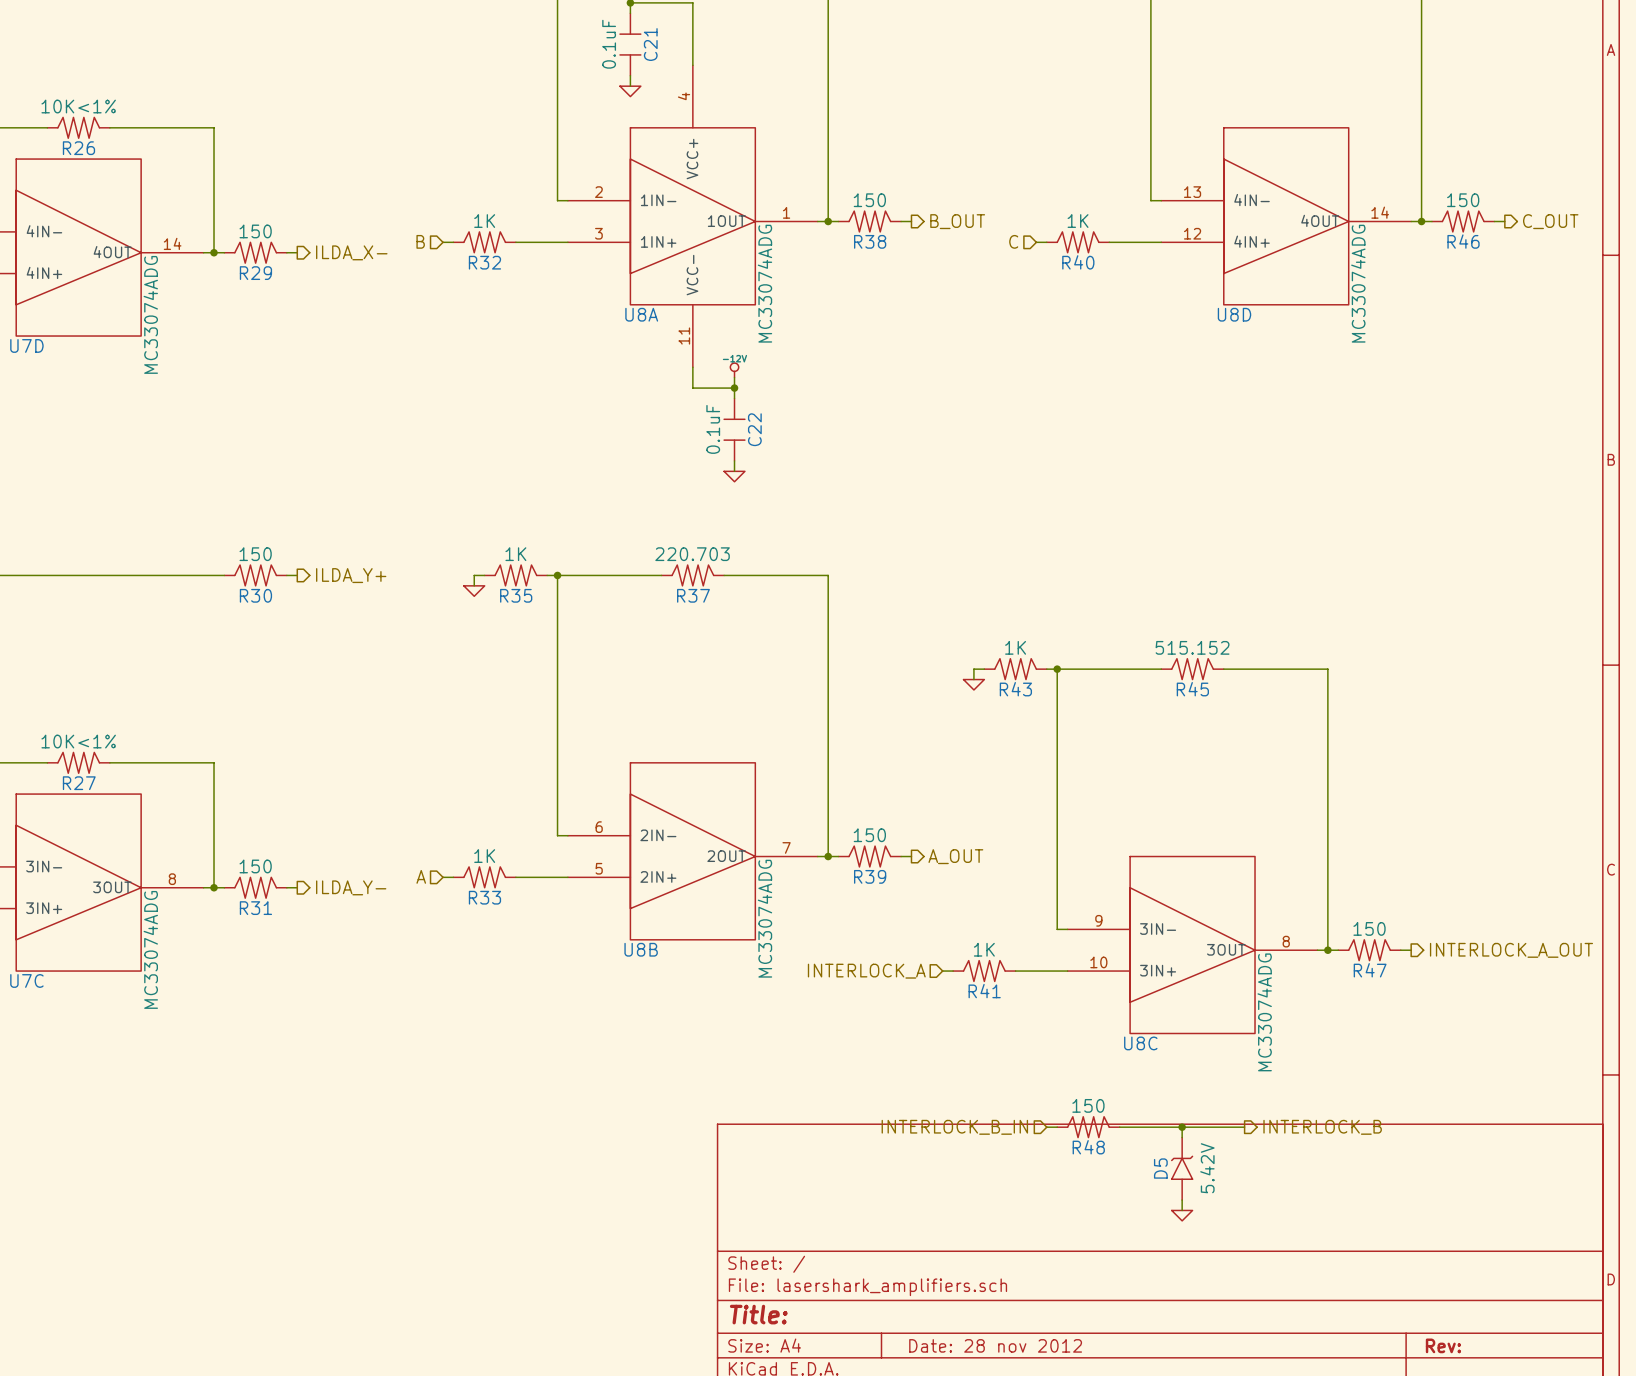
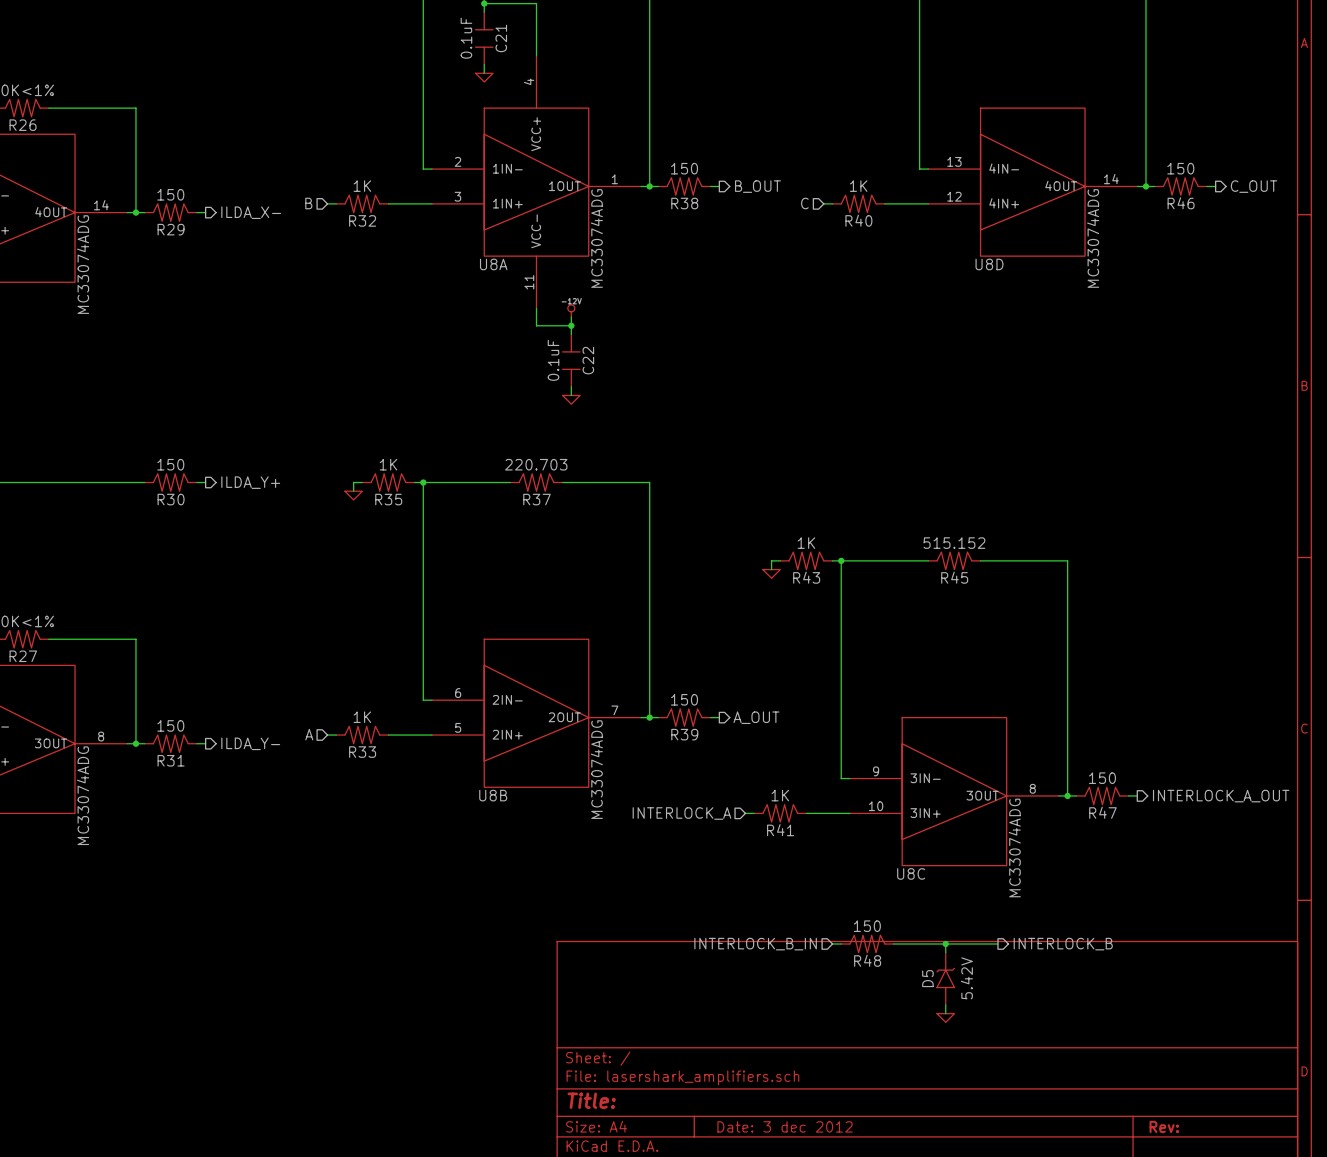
title block: Date: 28 nov 2012 (995, 1345) -> Date: 3 dec 2012 (785, 1126)

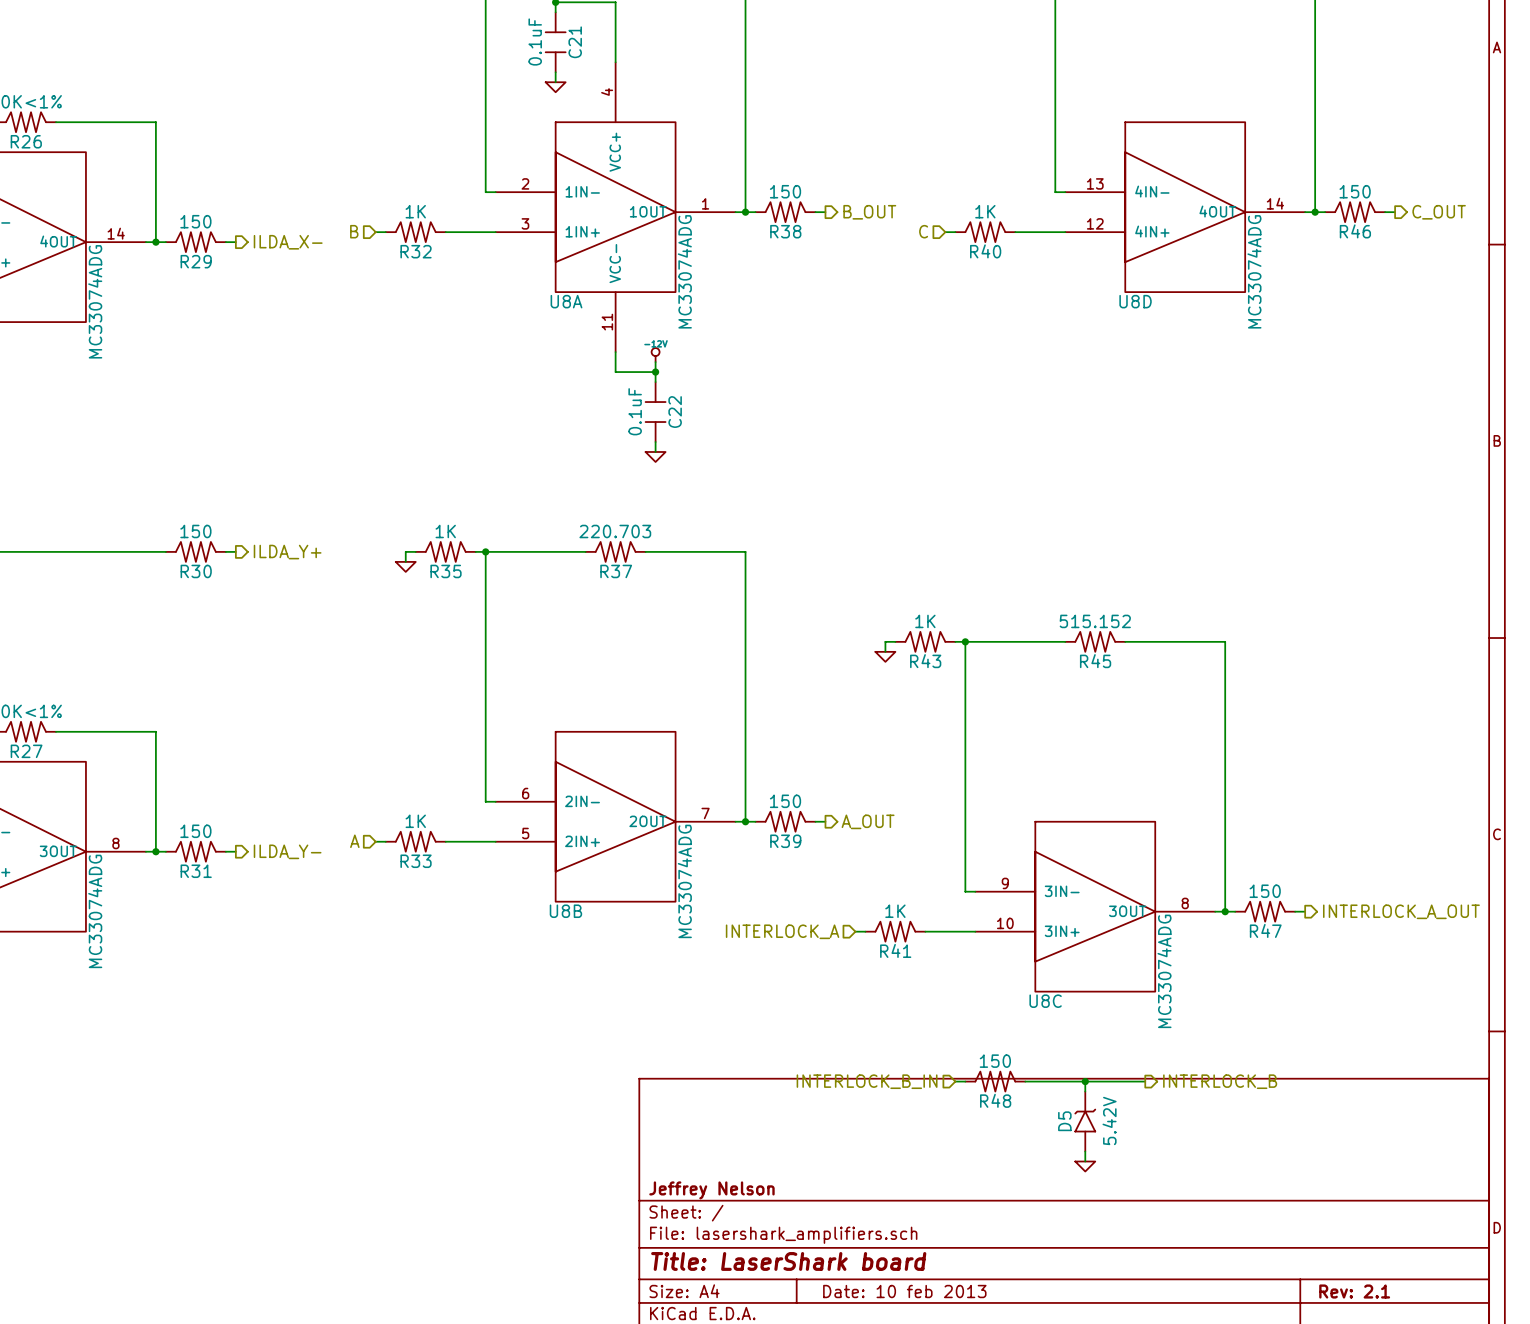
title block: none -> Jeffrey Nelson (711, 1190)
title block: Title: (591, 1100) -> Title: LaserShark board (788, 1261)
title block: Date: 3 dec 2012 (785, 1126) -> Date: 10 feb 2013 (904, 1291)
title block: Rev: (1164, 1126) -> Rev: 2.1 (1354, 1291)

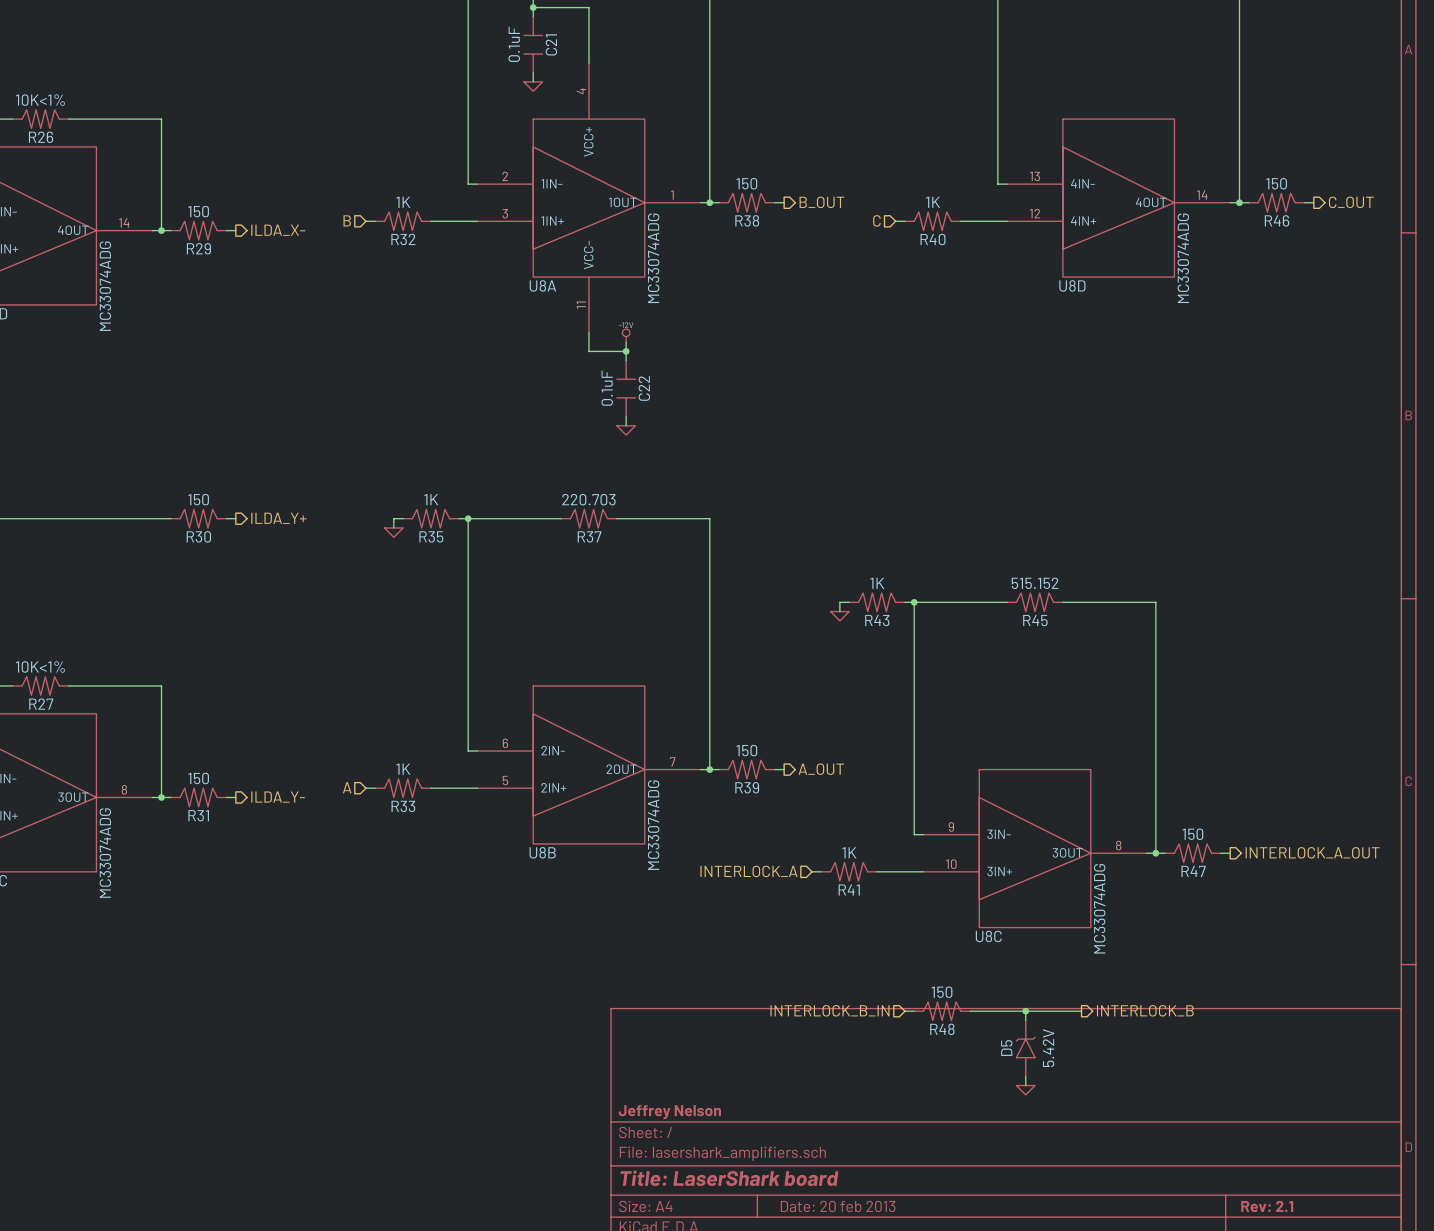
title block: Date: 10 feb 2013 (904, 1291) -> Date: 20 feb 2013 (838, 1206)

